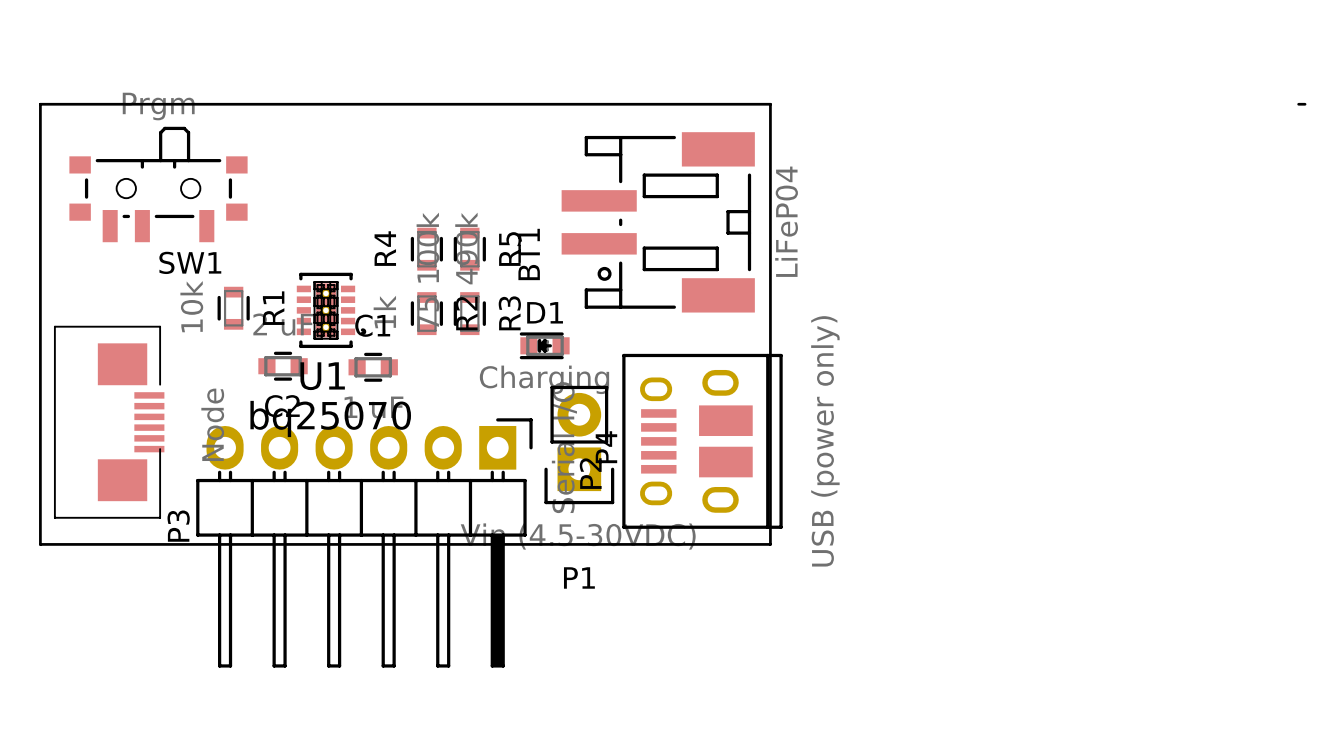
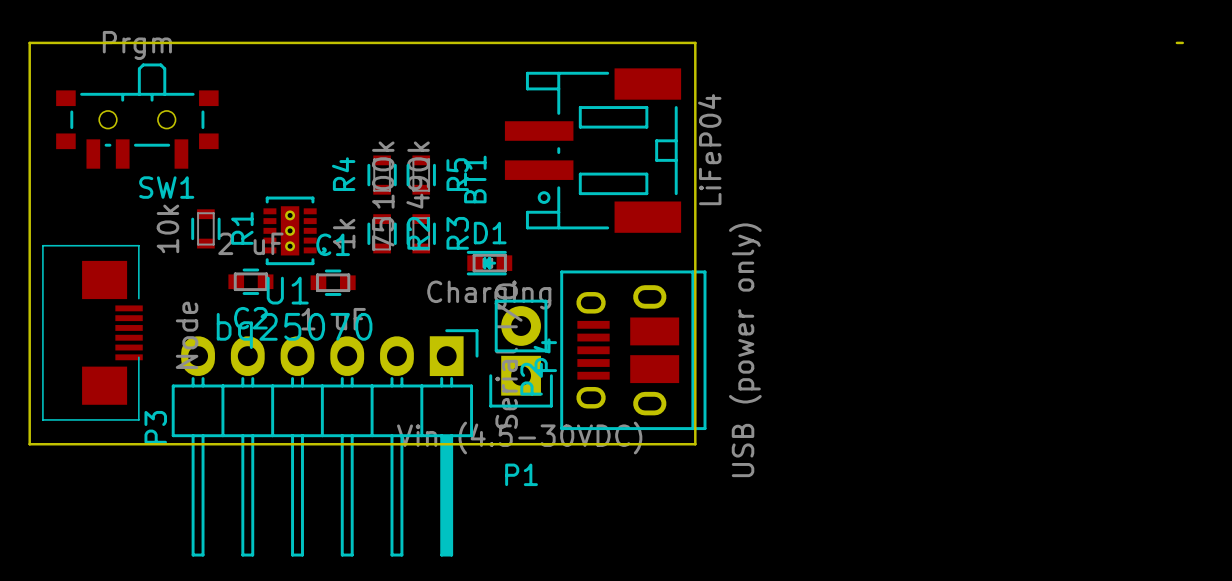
U1 footprint: [296, 272, 367, 349] -> [263, 196, 327, 266]

